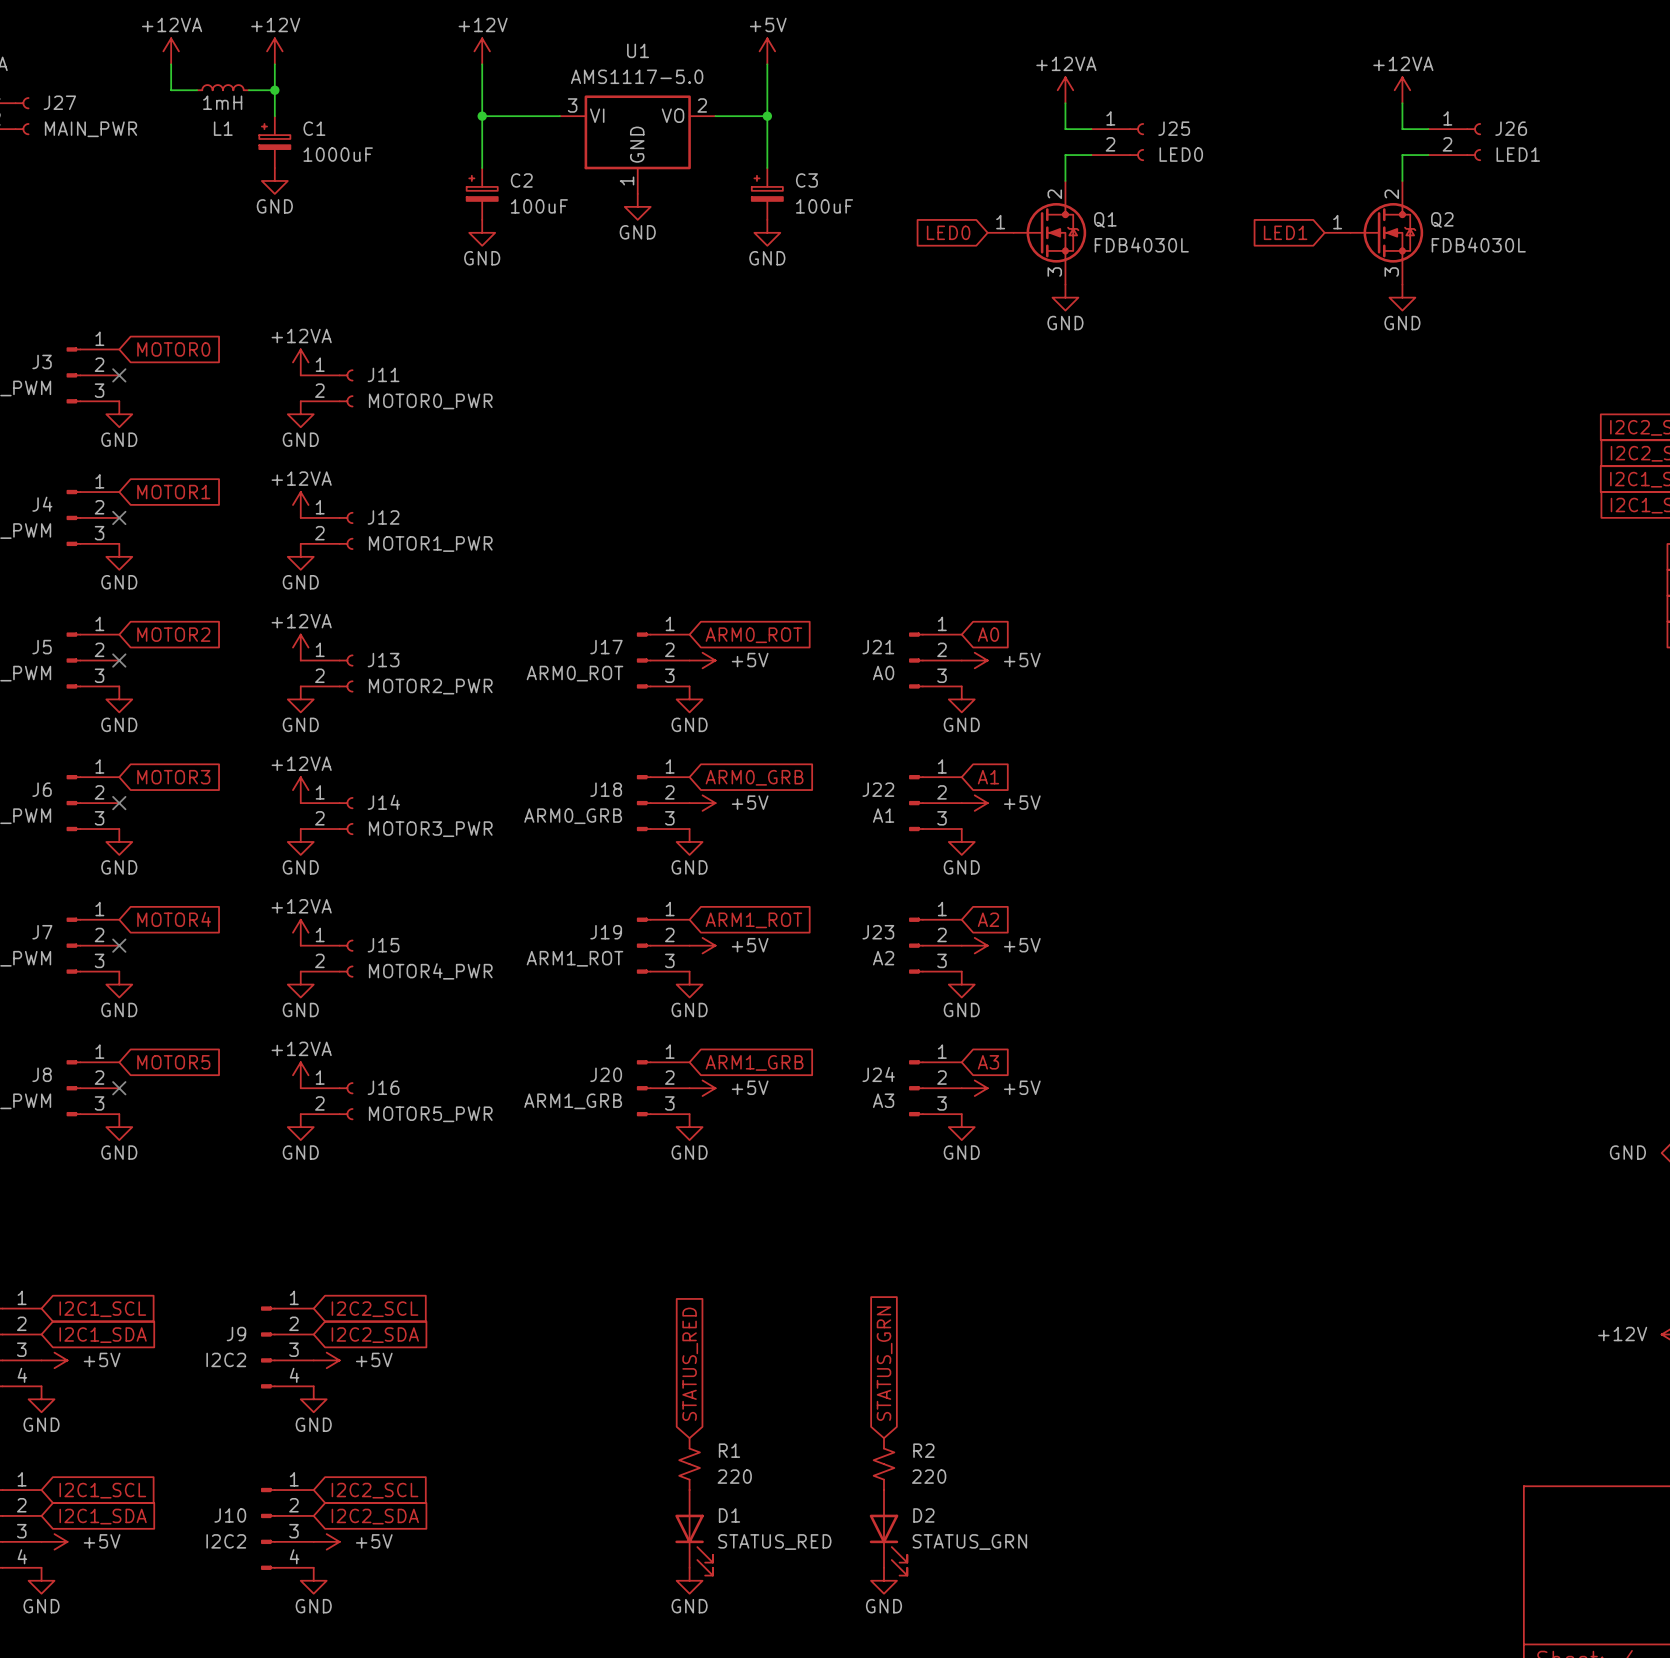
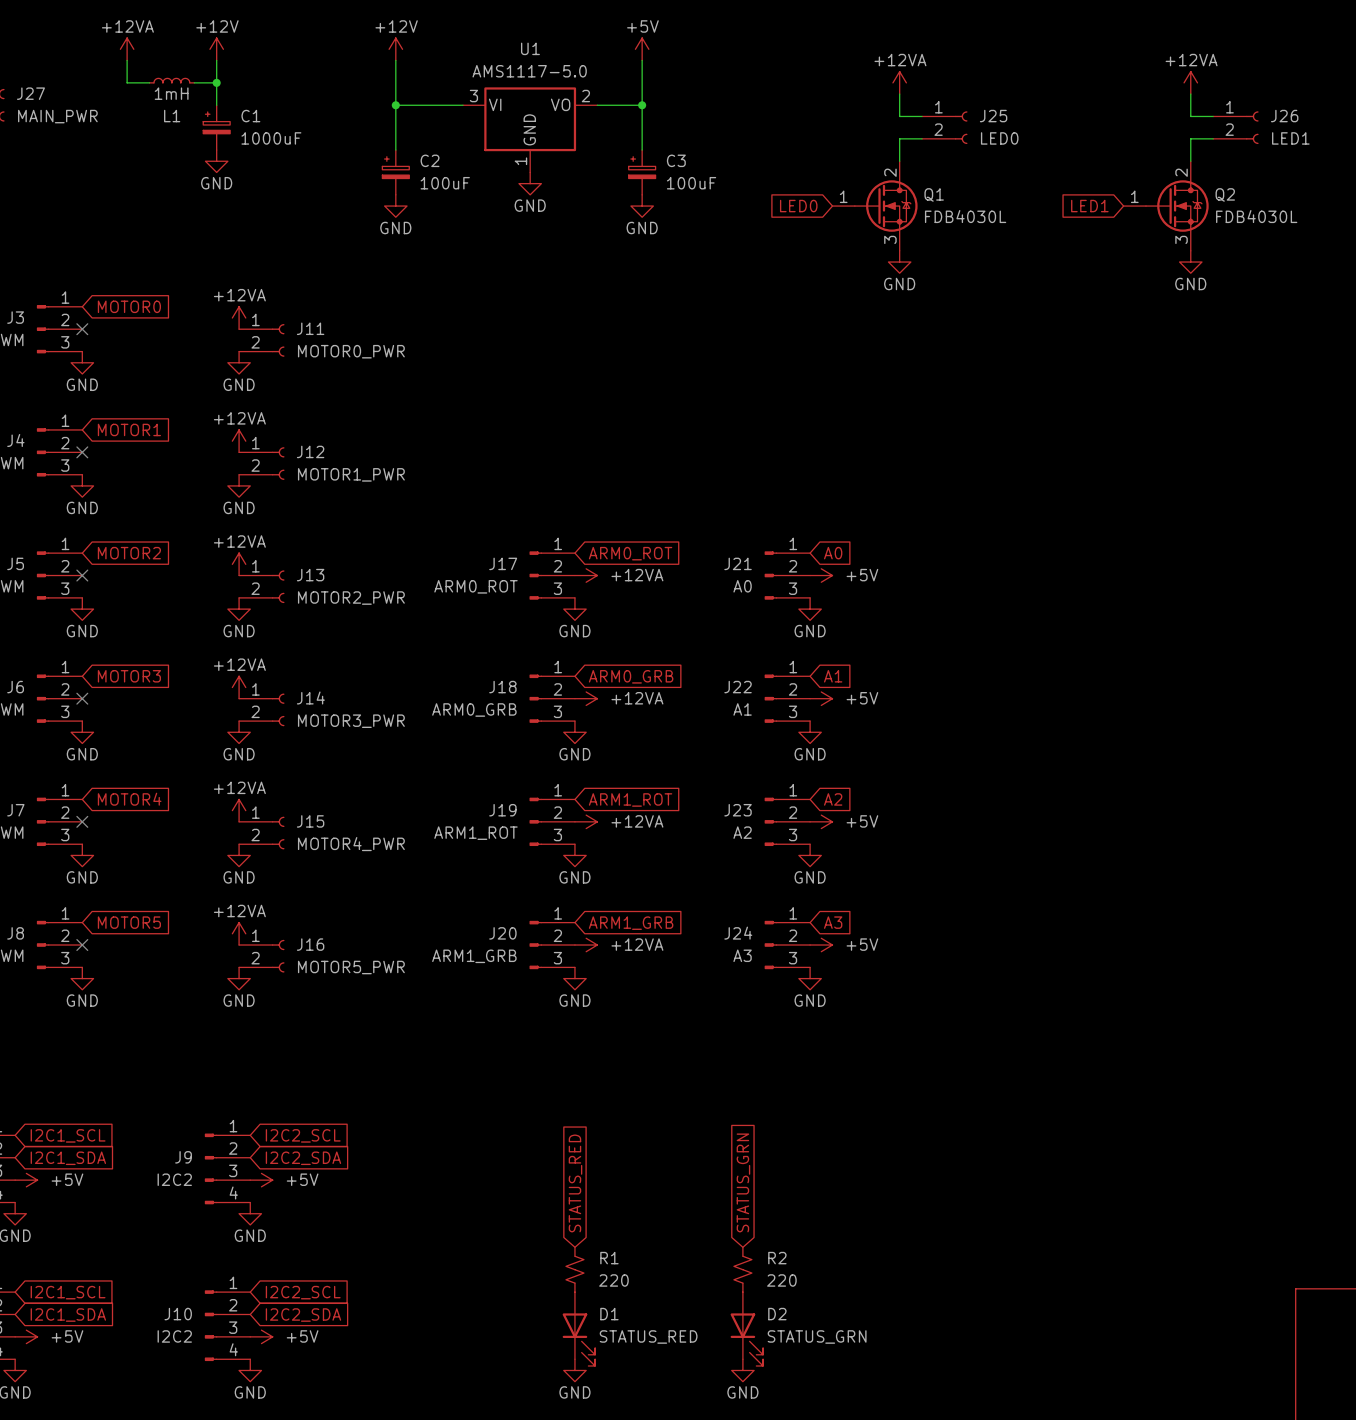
power symbol: +5V (702, 660) -> +12VA (586, 575)
power symbol: +5V (702, 803) -> +12VA (586, 698)
power symbol: +5V (702, 945) -> +12VA (586, 821)
power symbol: +5V (702, 1088) -> +12VA (586, 945)

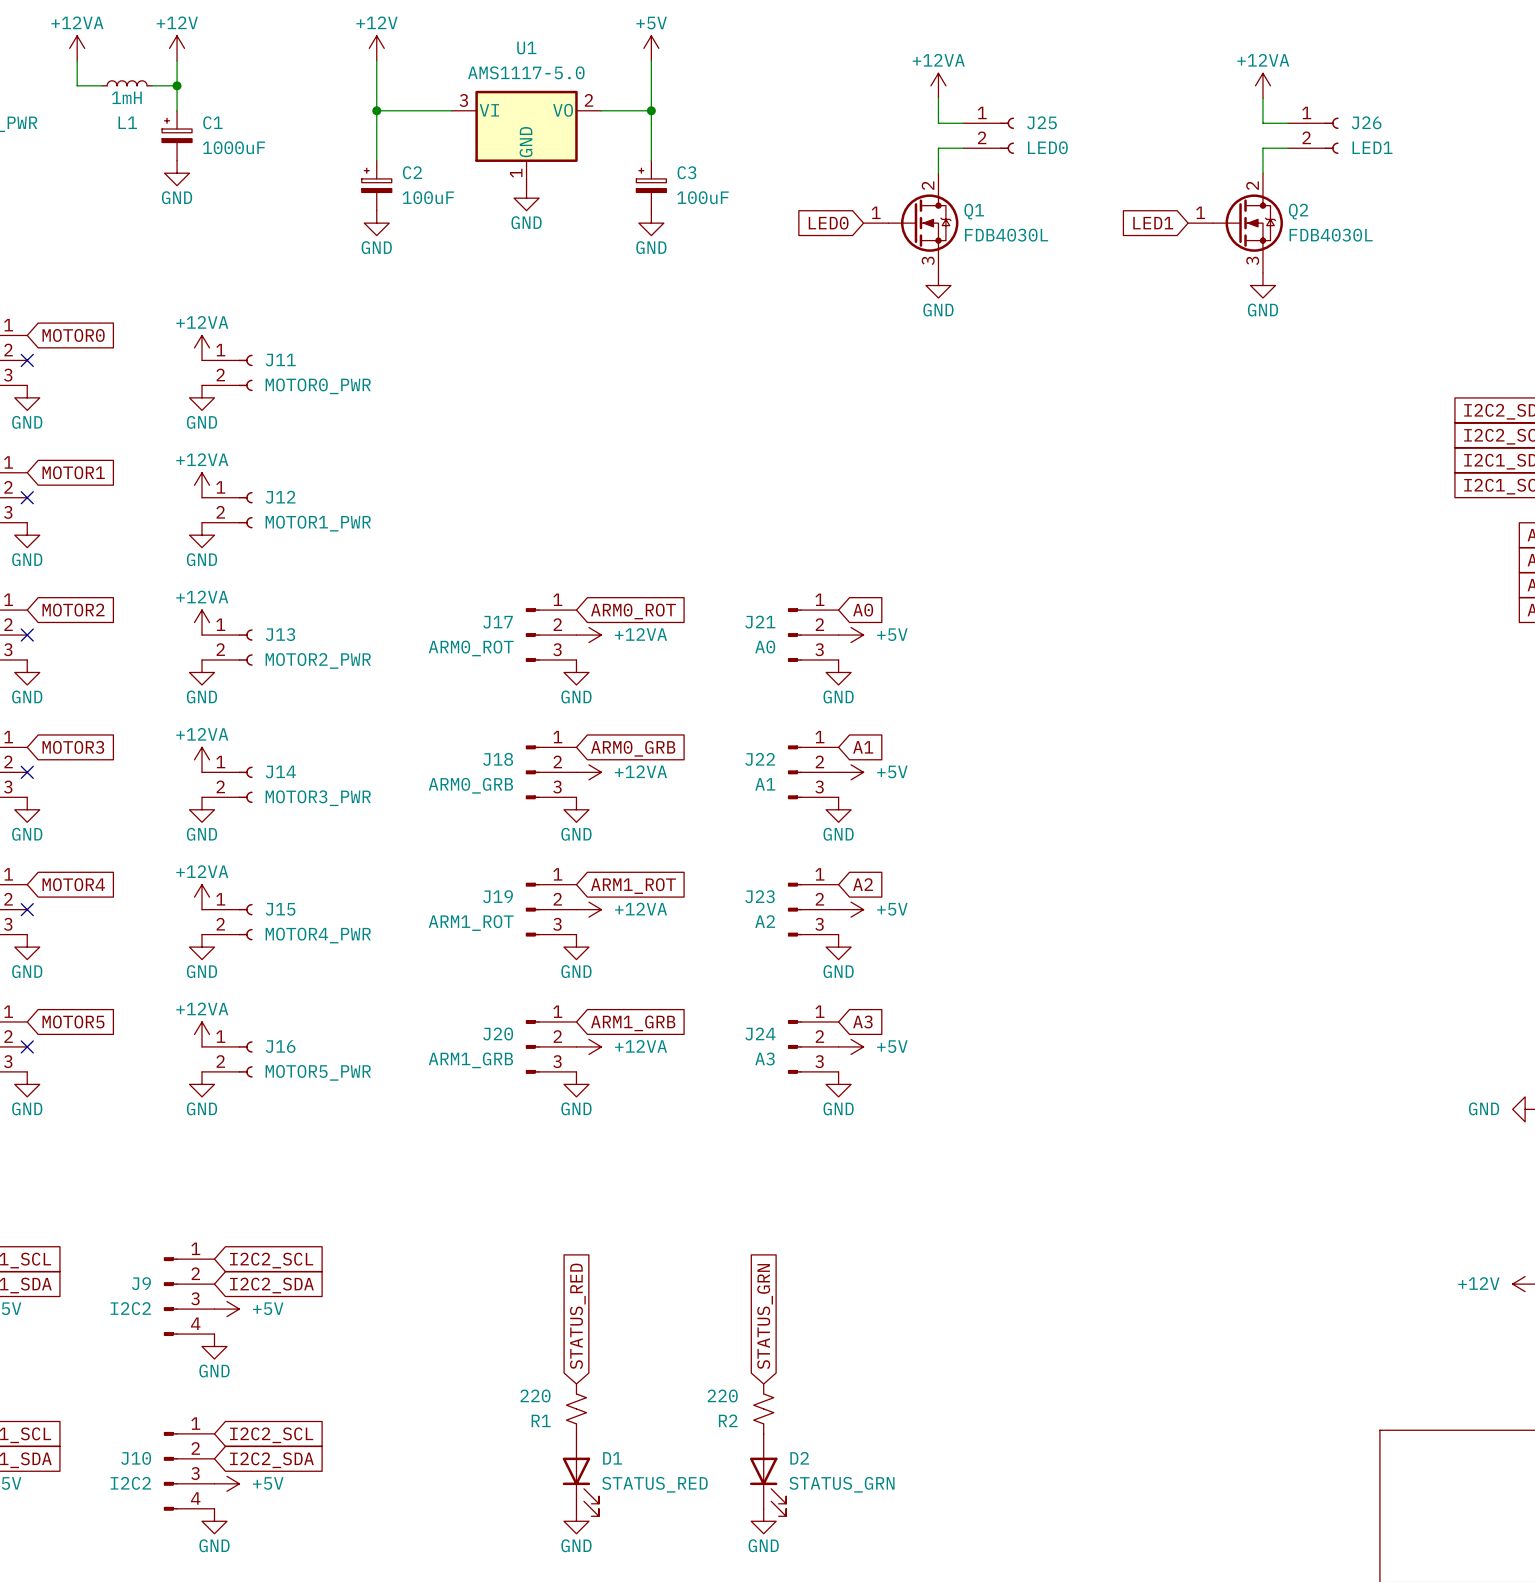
R1 name position: R1 (609, 1258) -> R1 (541, 1420)
R2 name position: R2 (777, 1258) -> R2 (728, 1420)
R1 value position: 220 (613, 1280) -> 220 (535, 1395)
R2 value position: 220 (781, 1280) -> 220 (722, 1395)

